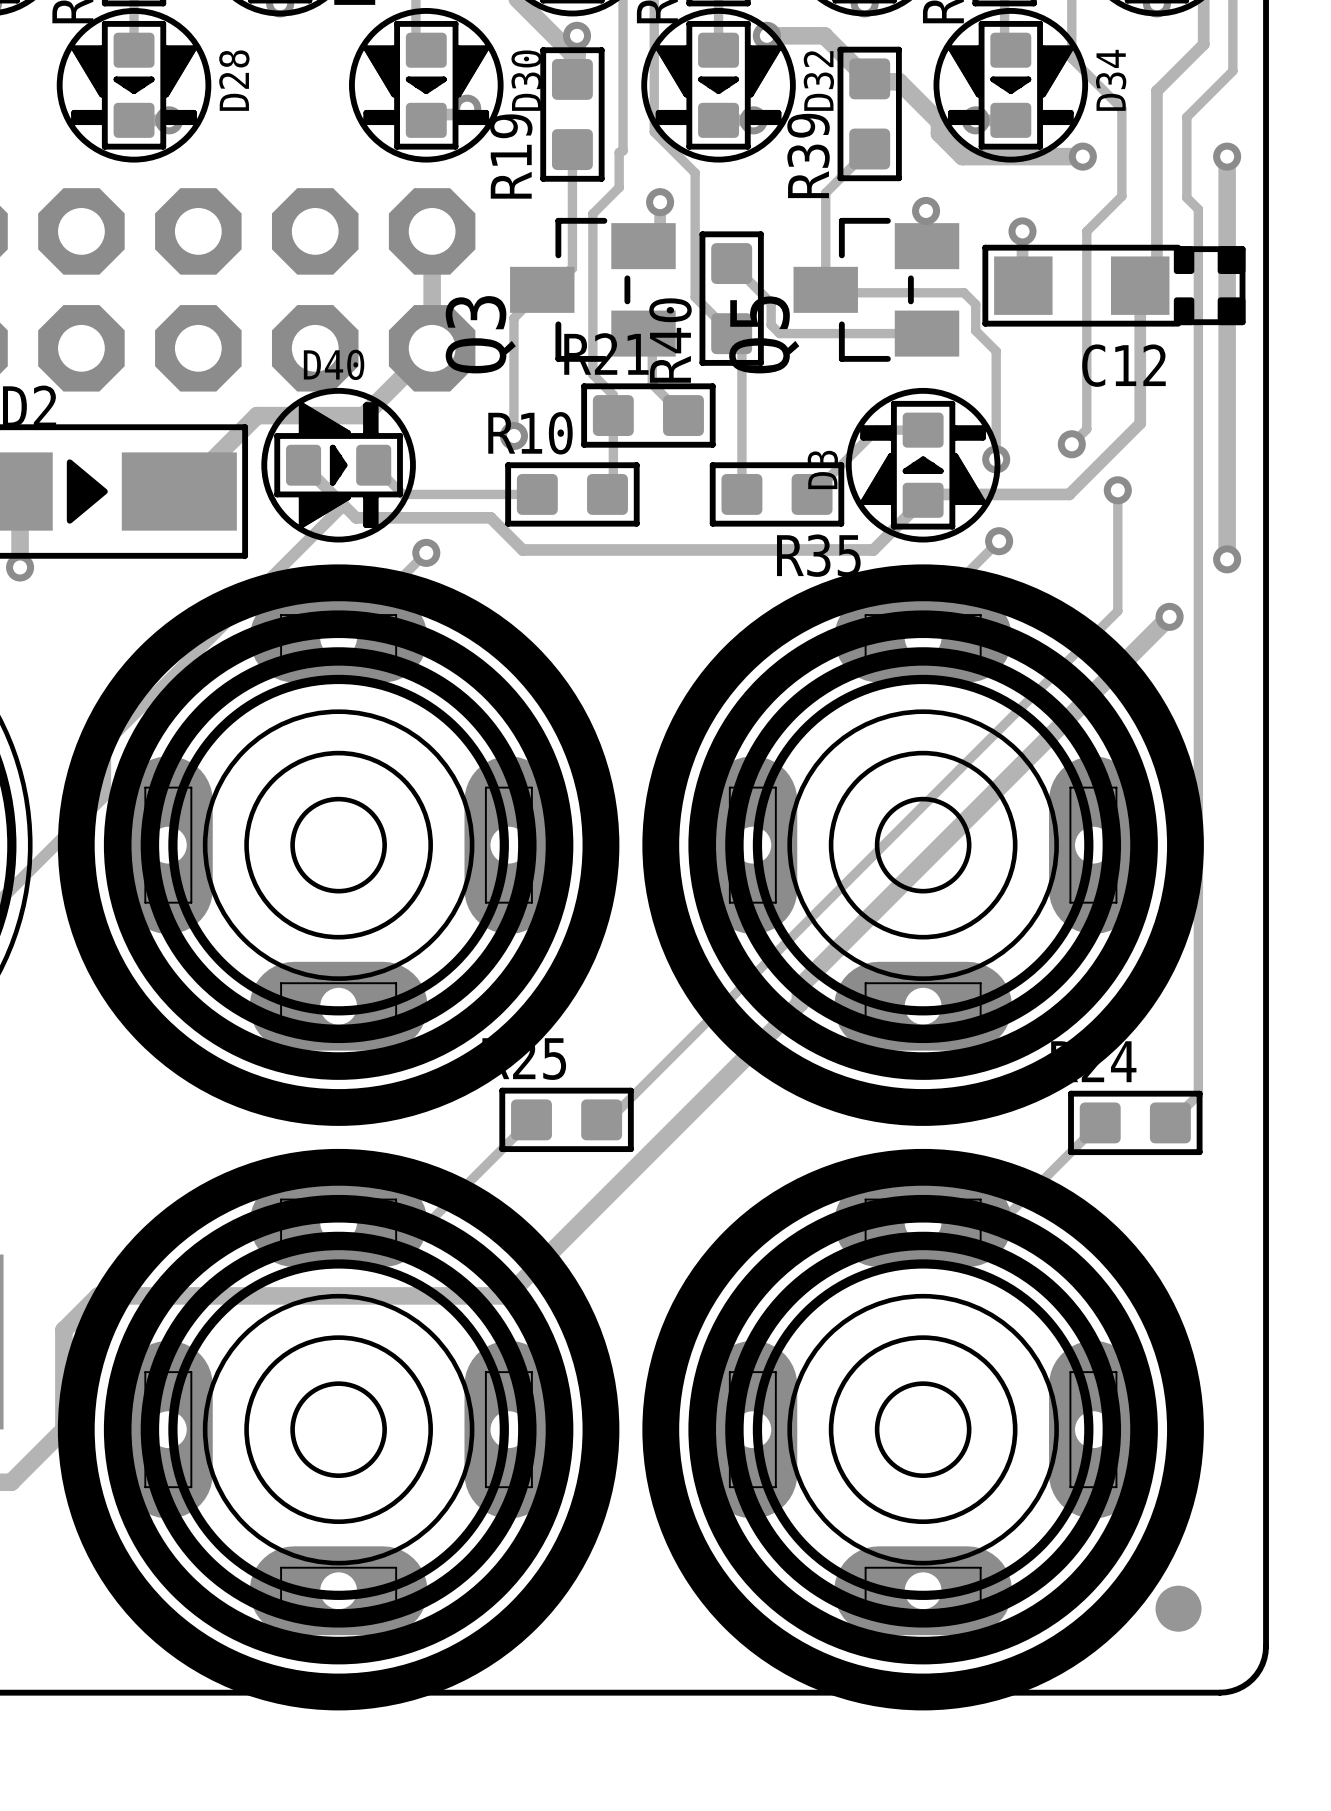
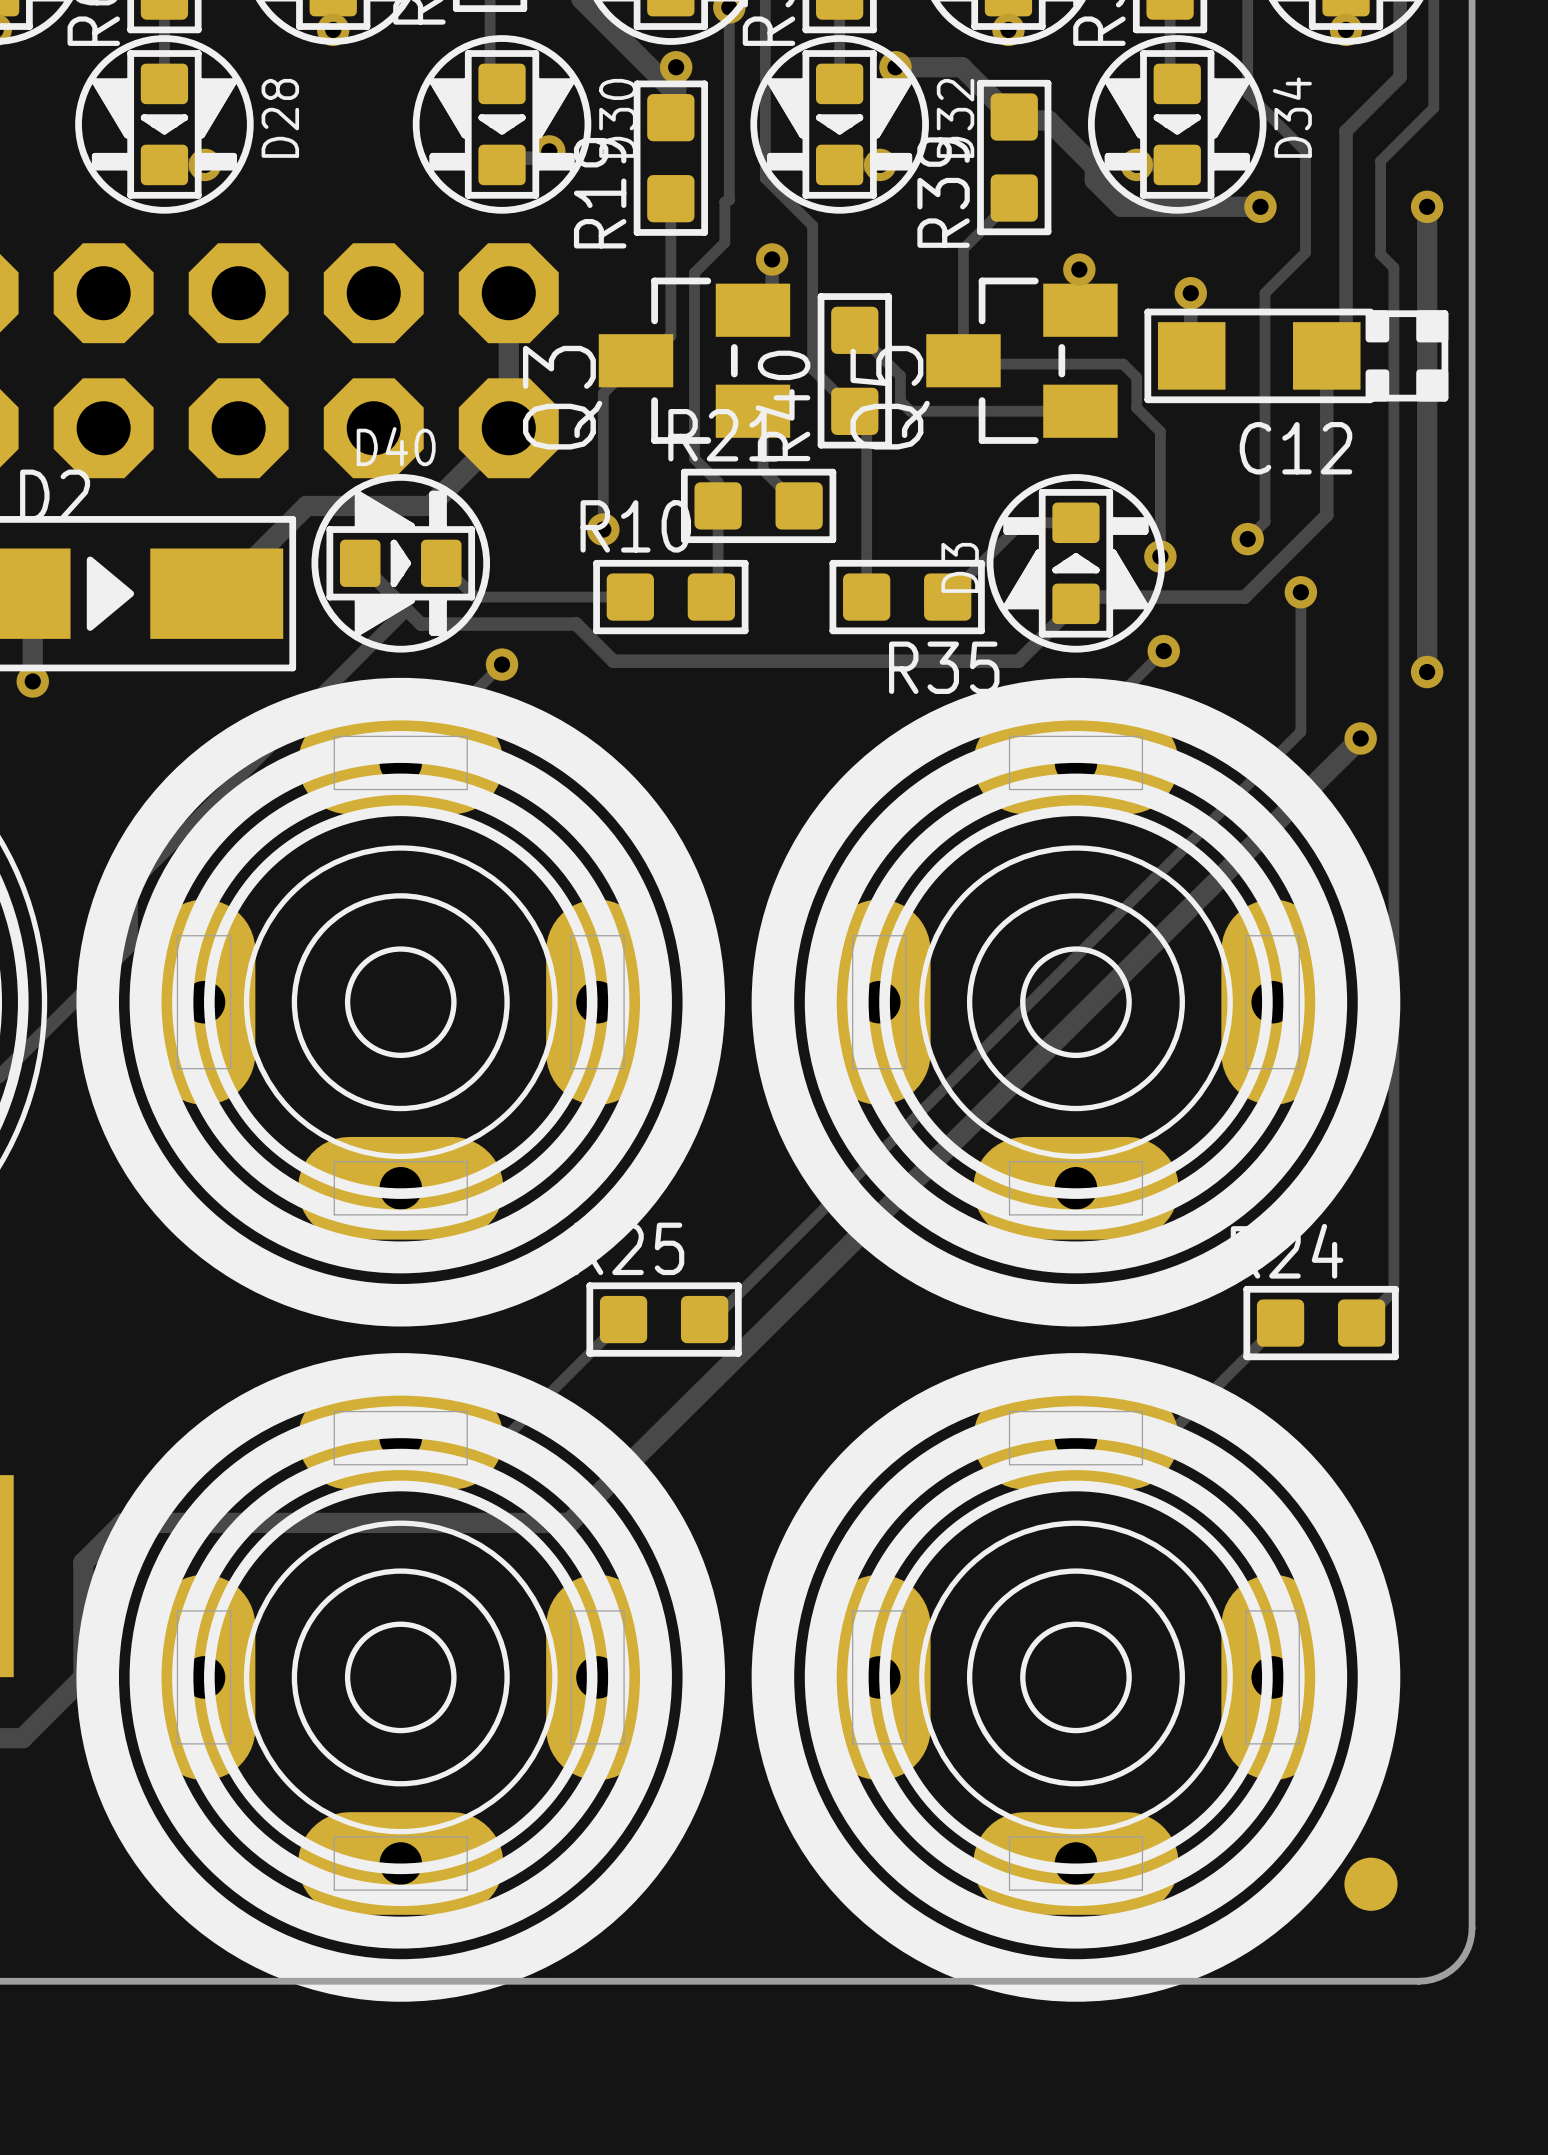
track: (1169, 616) (800, 986) (800, 1002) (507, 1295) (484, 1295) -> (1360, 738) (569, 1522)

